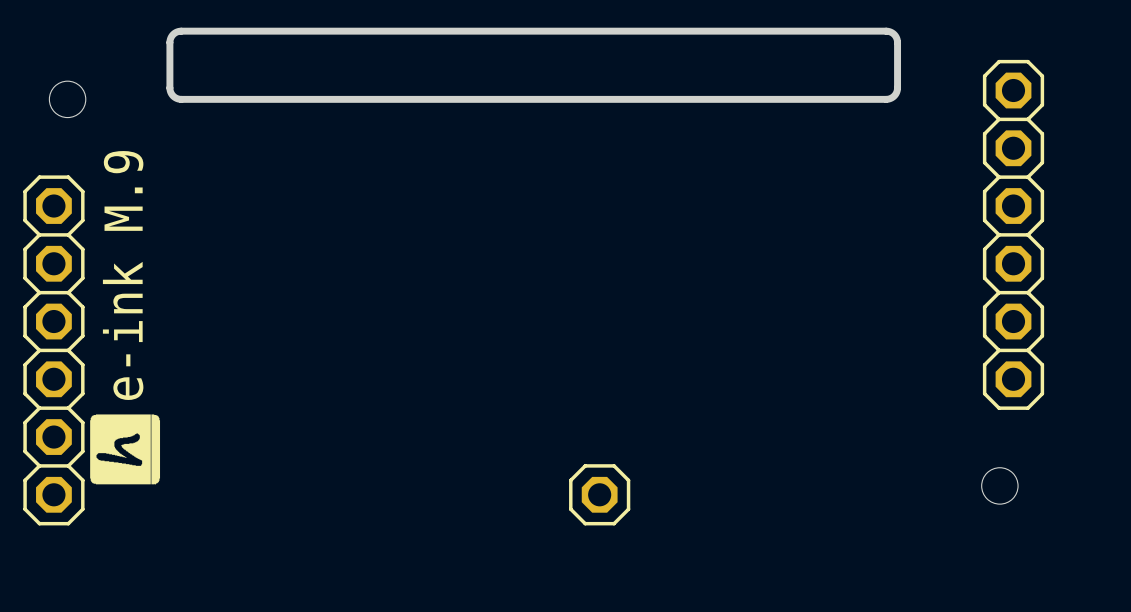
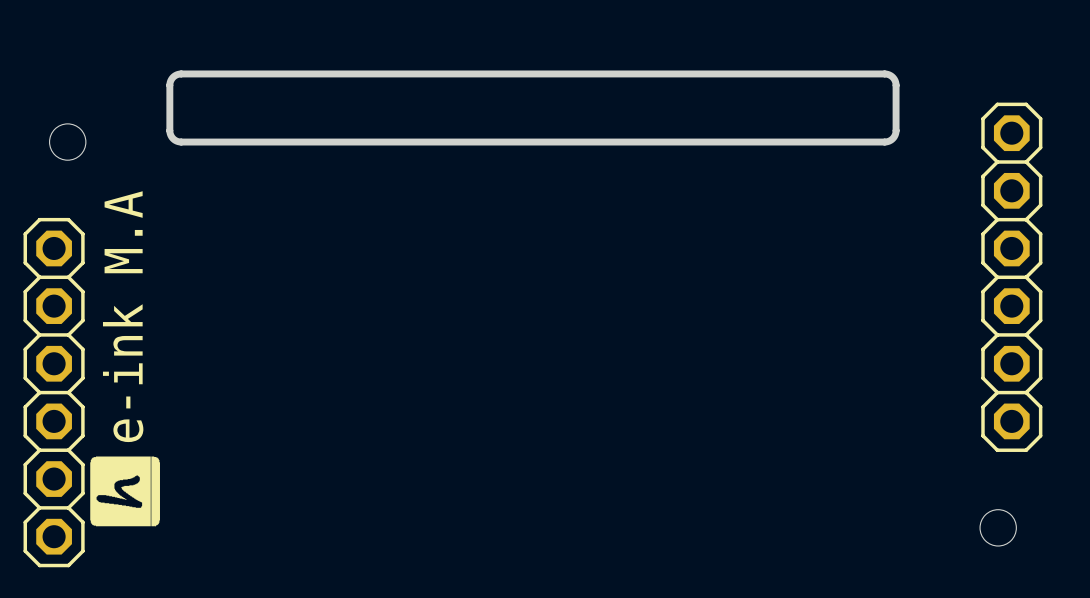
text: e-ink M.9 (123, 275) -> e-ink M.A (123, 316)
part: (599, 494) -> none

